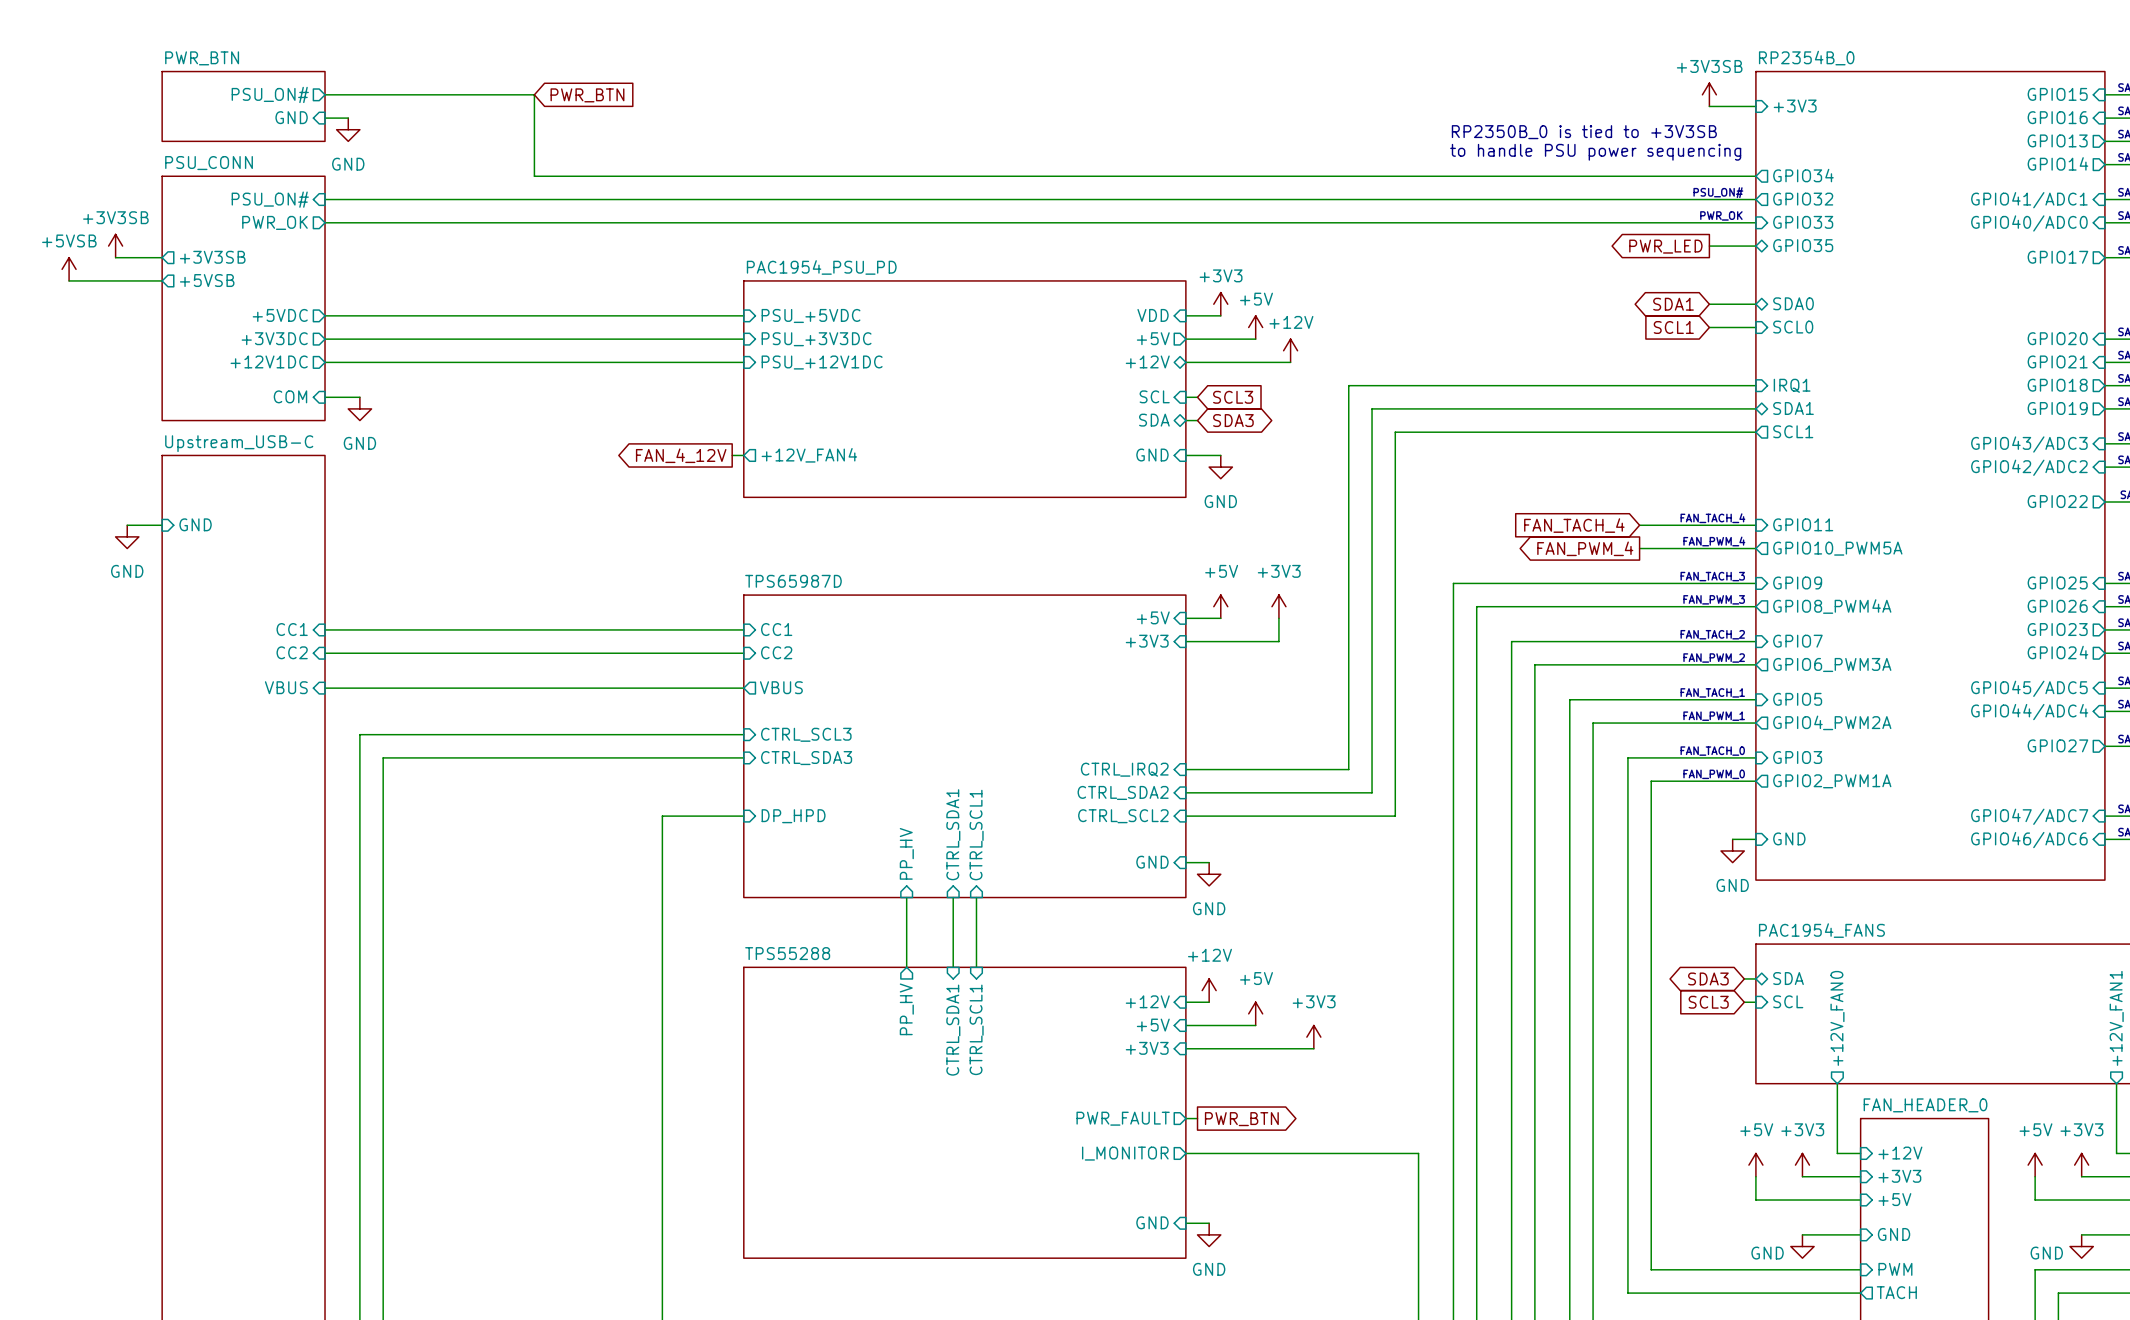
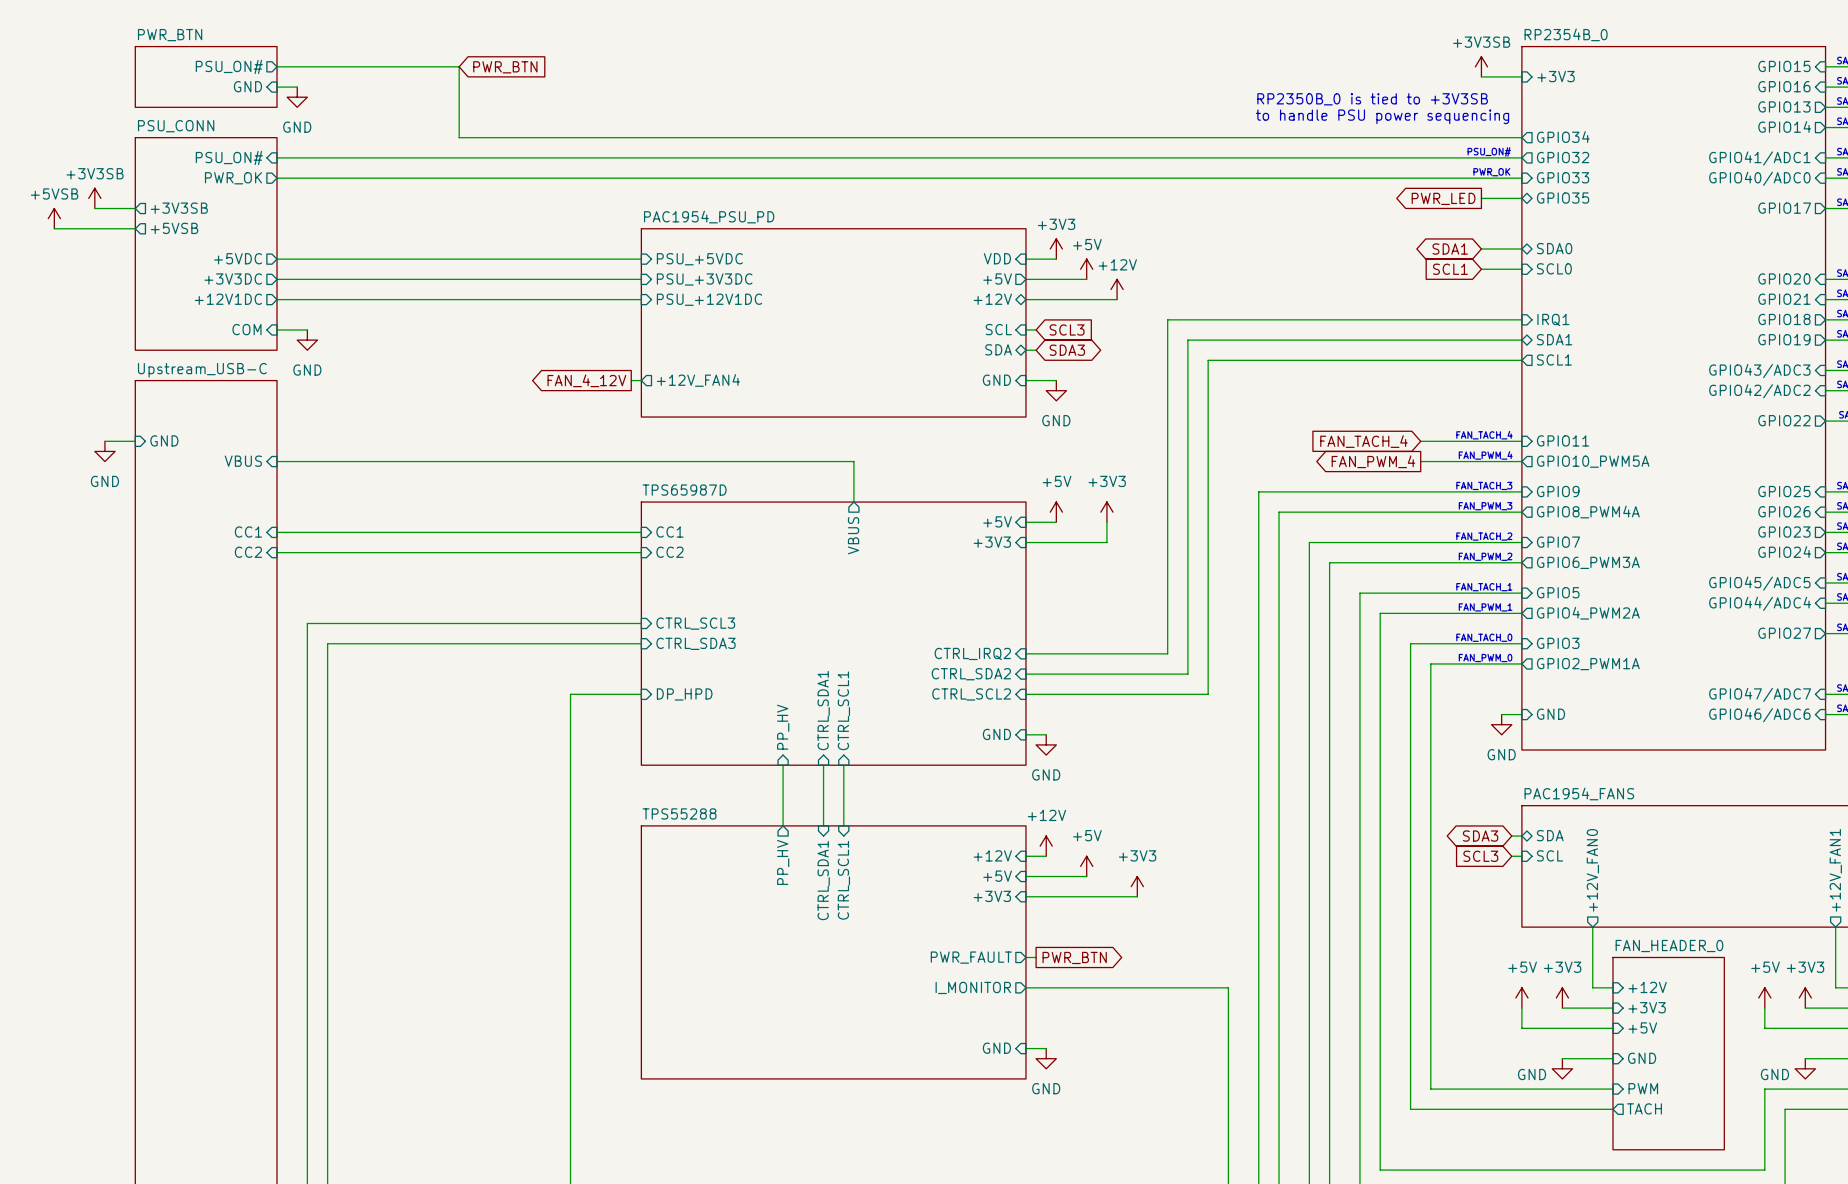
wire: none -> (277, 461) (853, 461) (853, 502)
sheet pin: none -> VBUS (853, 535)
sheet pin position: VBUS (286, 687) -> VBUS (243, 461)
sheet pin: VBUS (781, 687) -> none
wire: (325, 688) (743, 688) -> none

